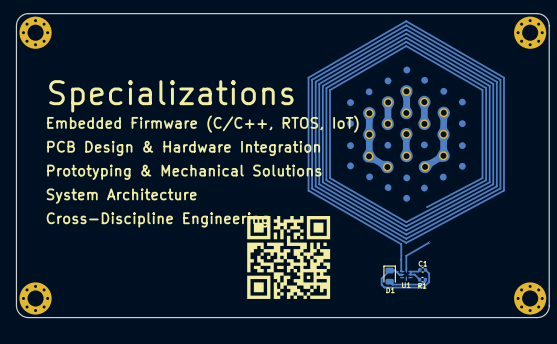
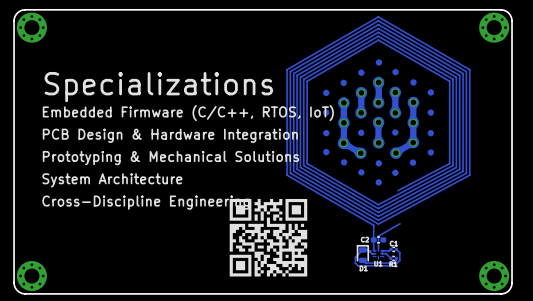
part: none -> (378, 239)

